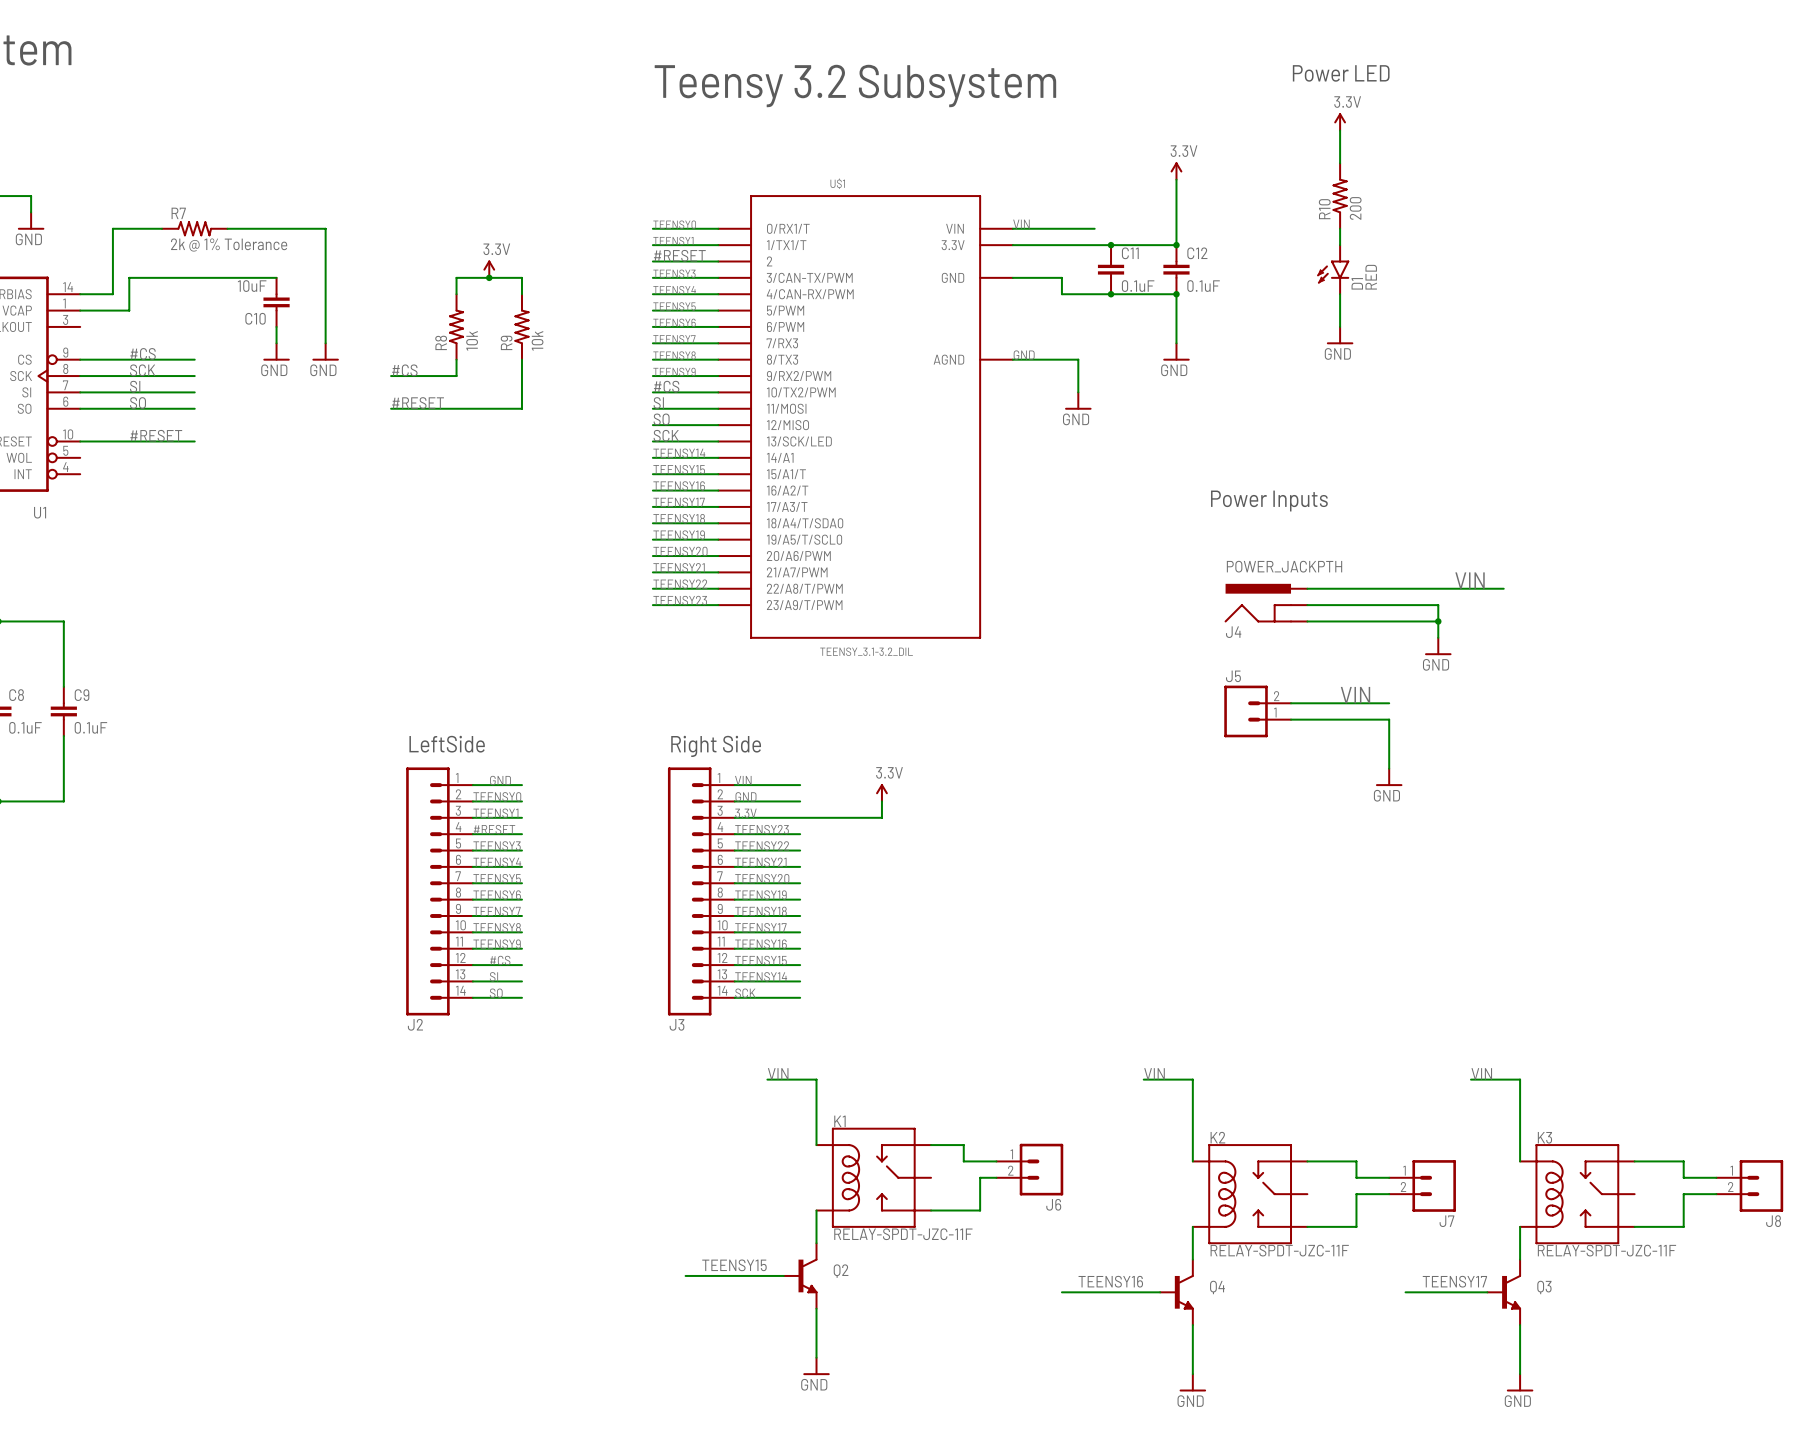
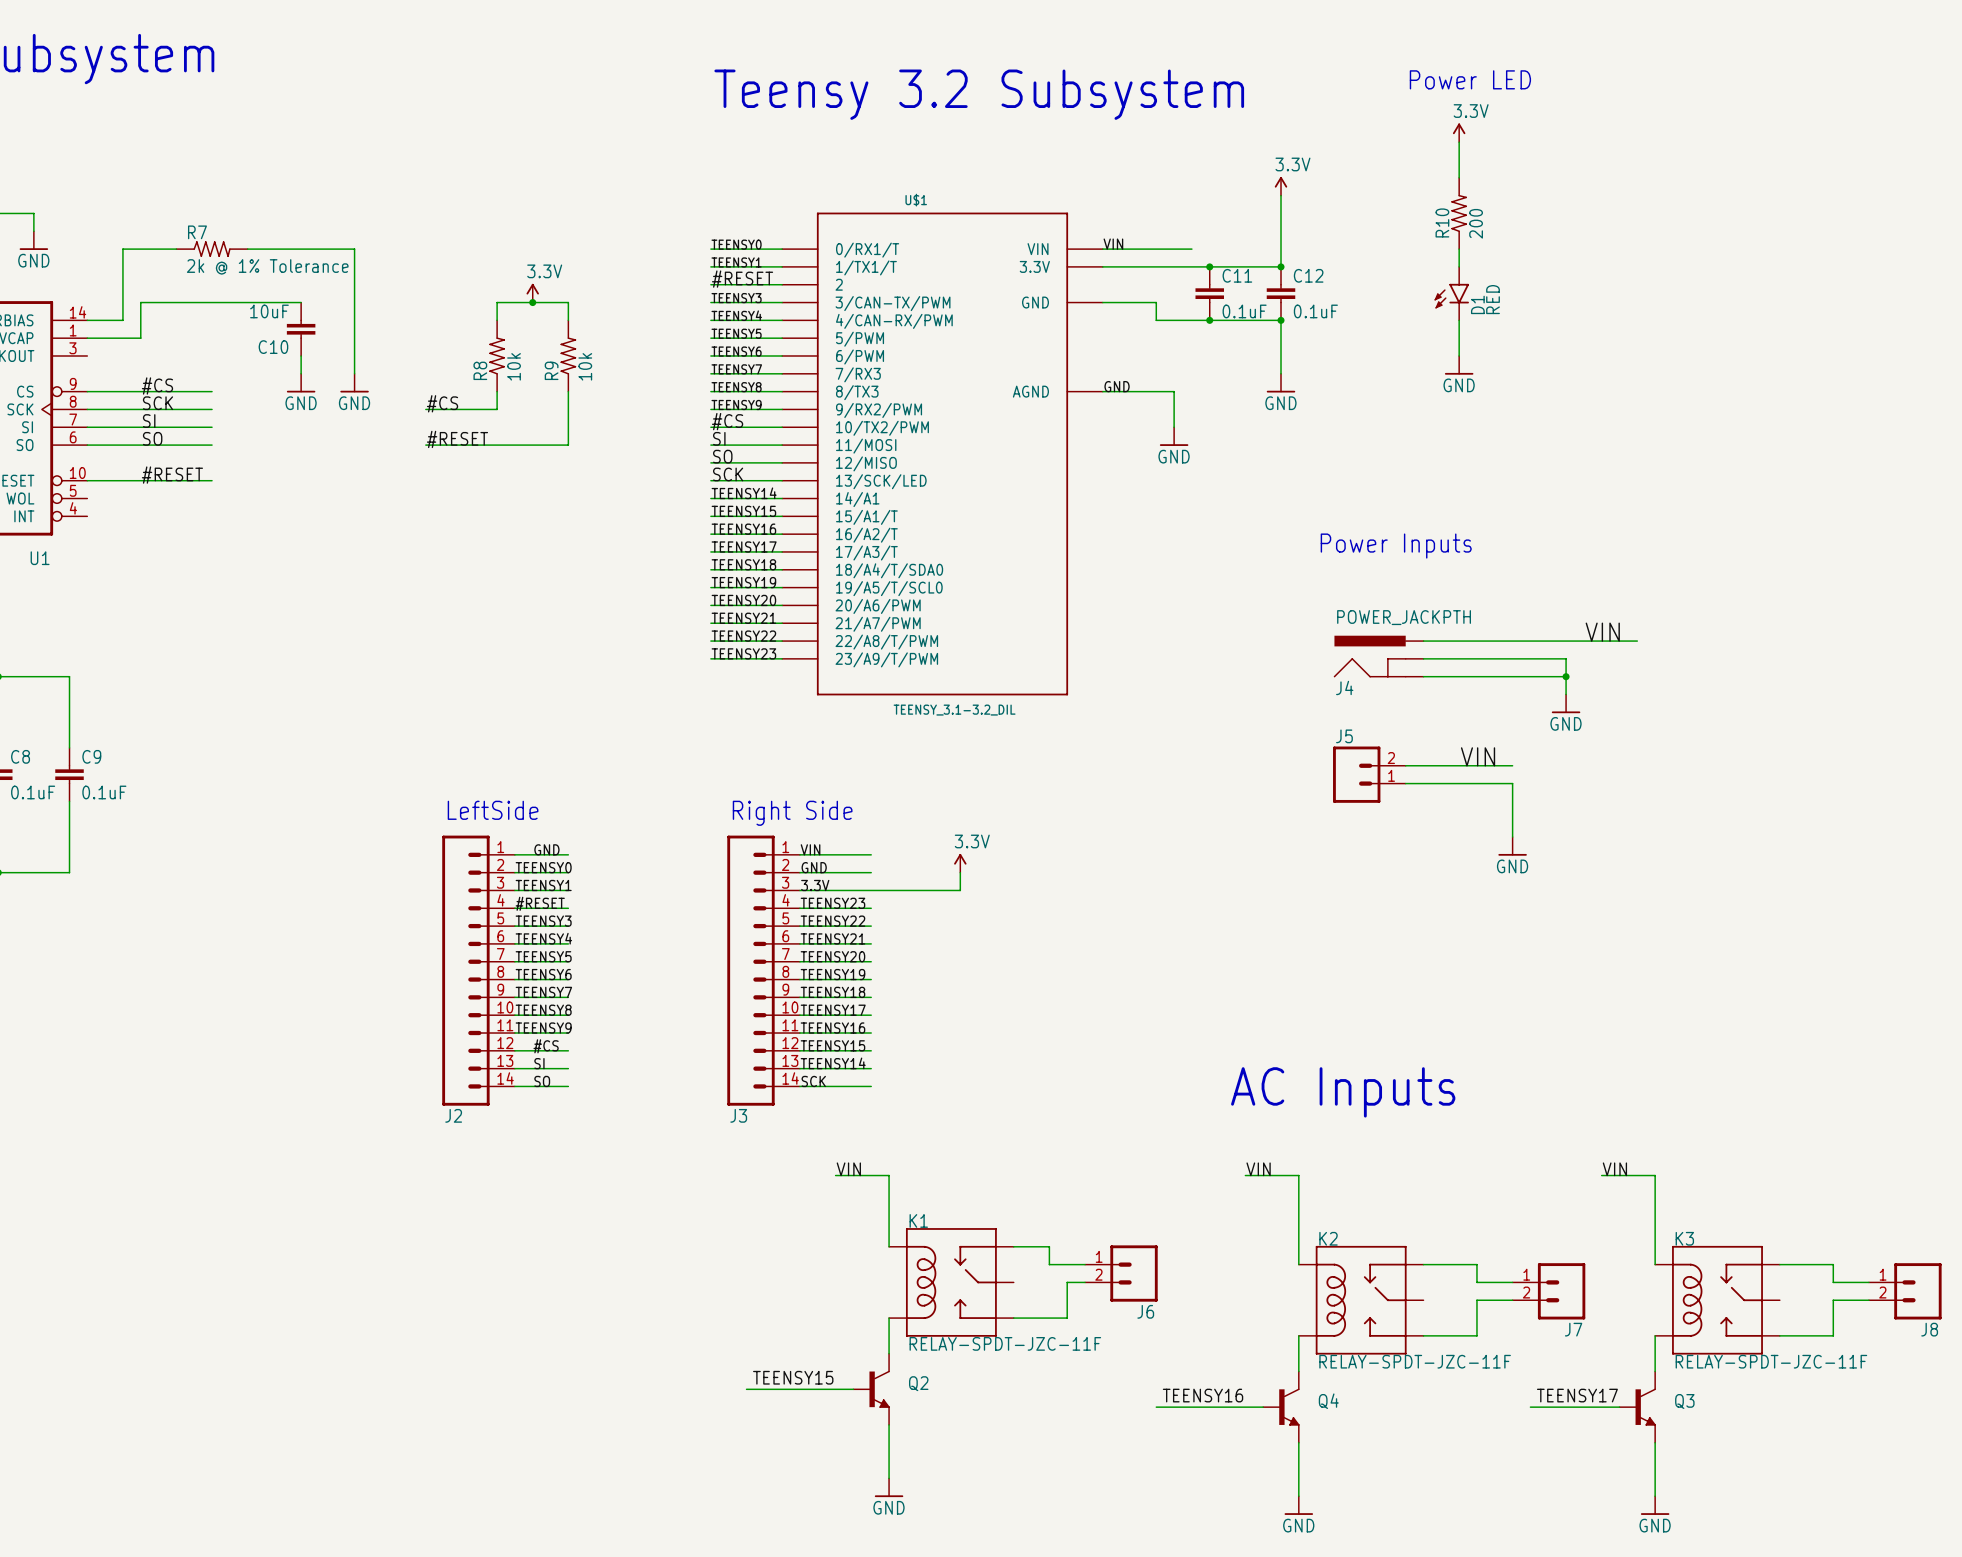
text: none -> AC Inputs (1343, 1092)

